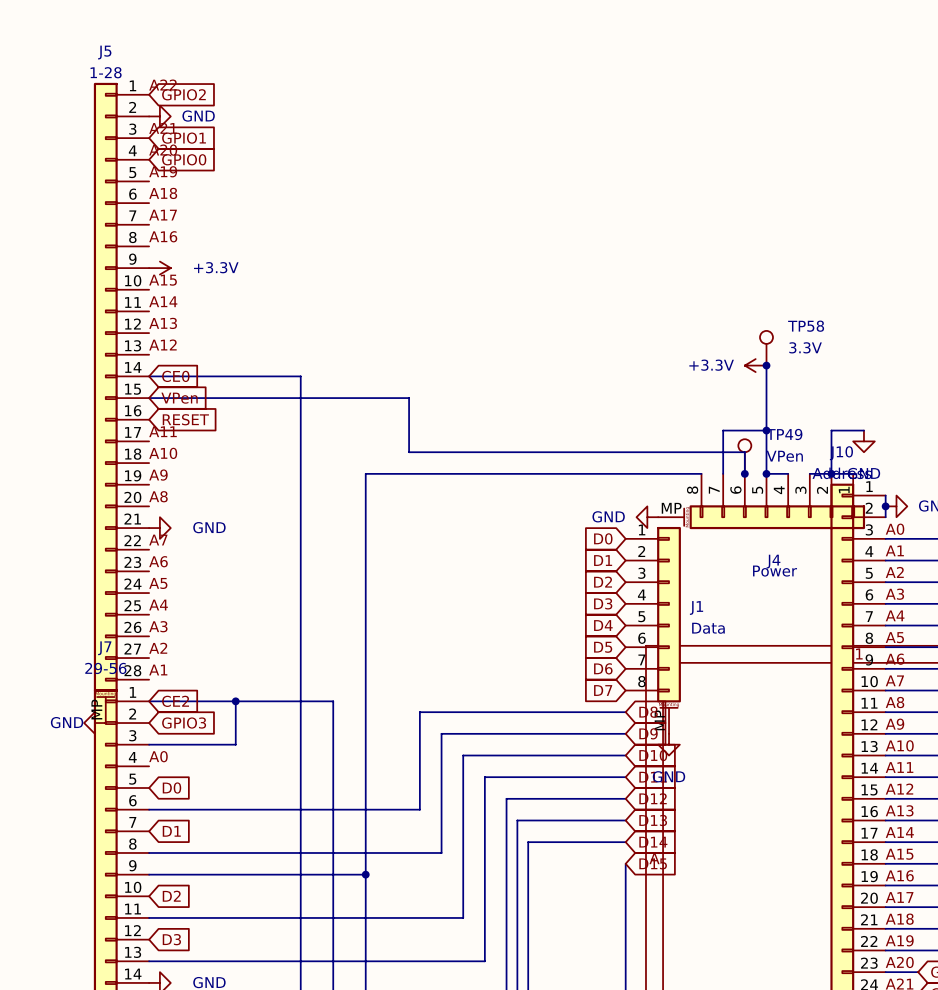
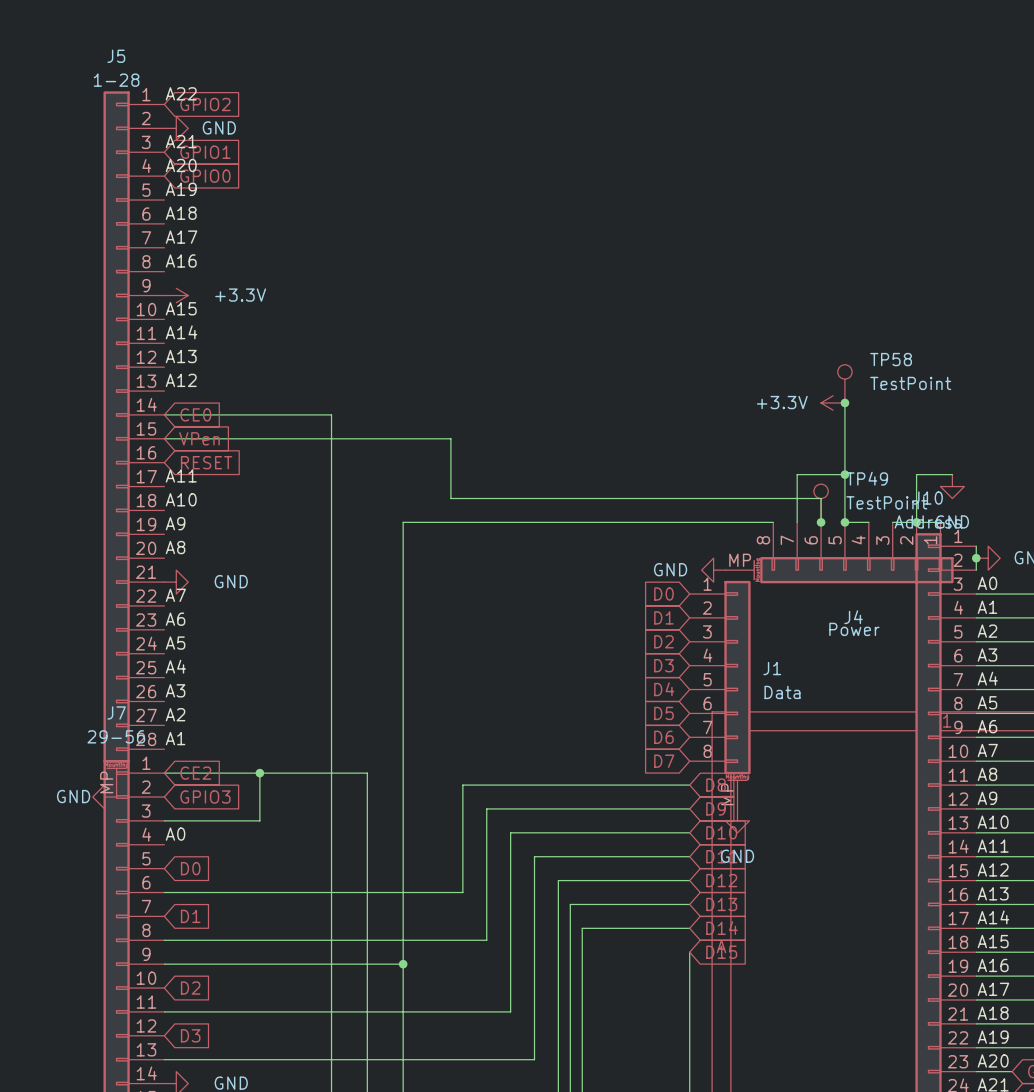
TP58 value: 3.3V (805, 347) -> TestPoint (910, 383)
TP49 value: VPen (784, 456) -> TestPoint (886, 502)

